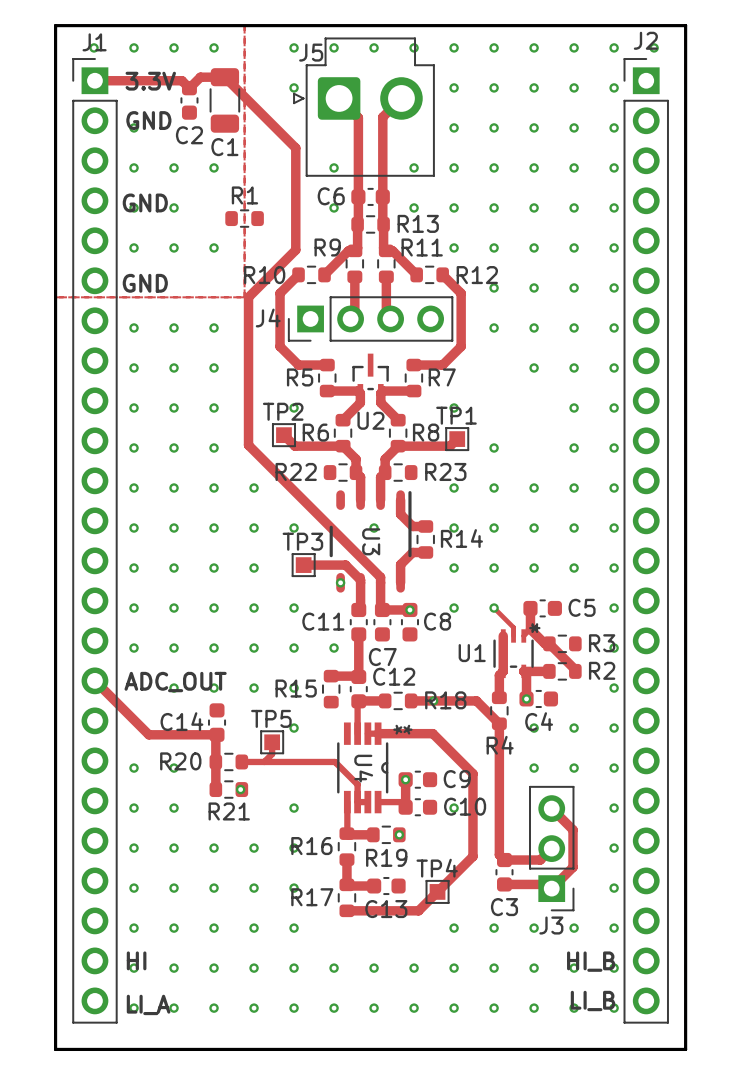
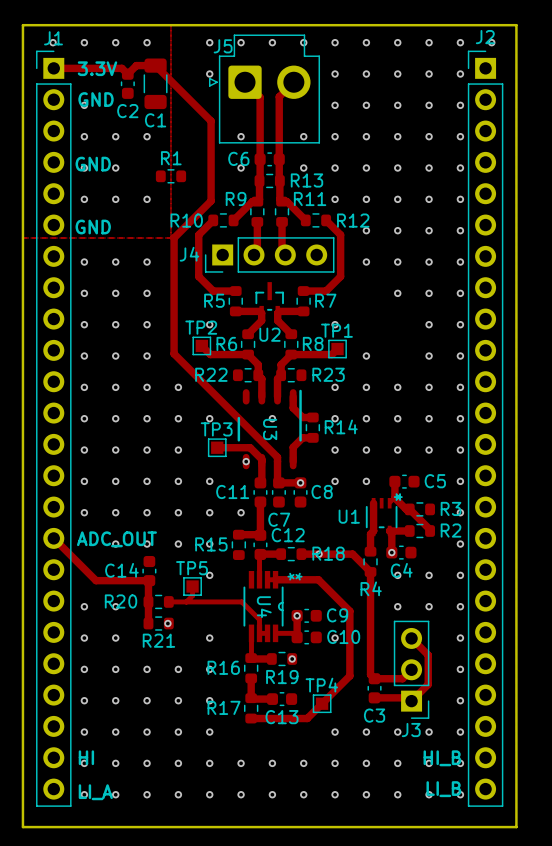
track: (494, 608) (513, 627) (513, 635) -> none

